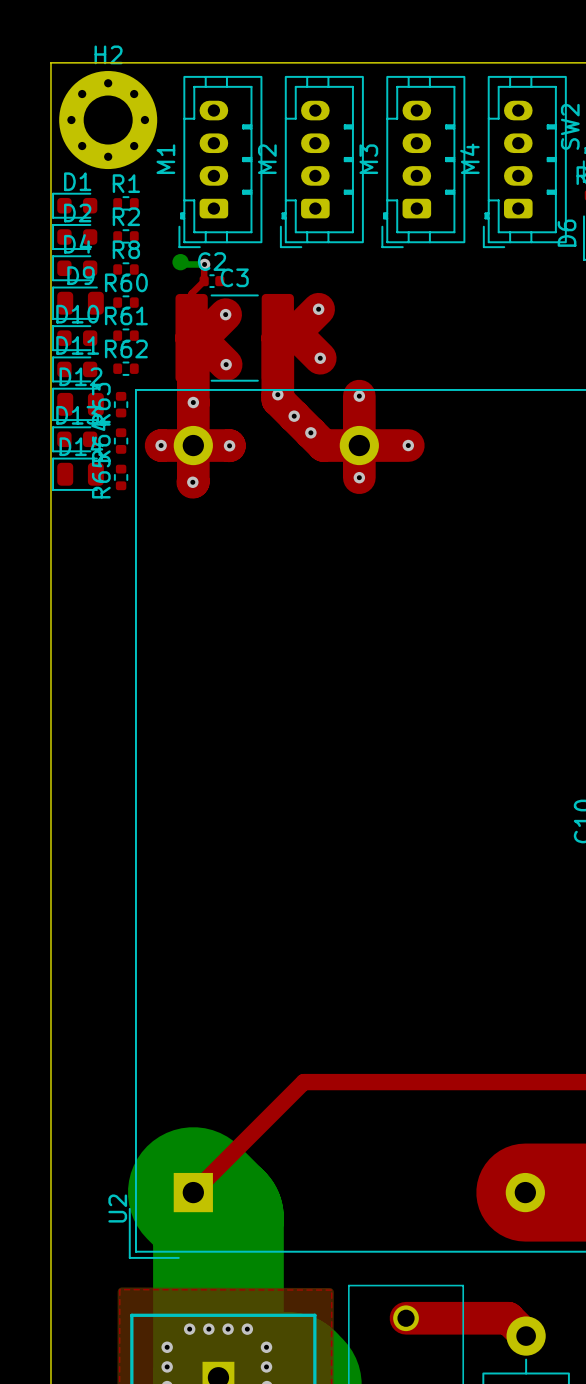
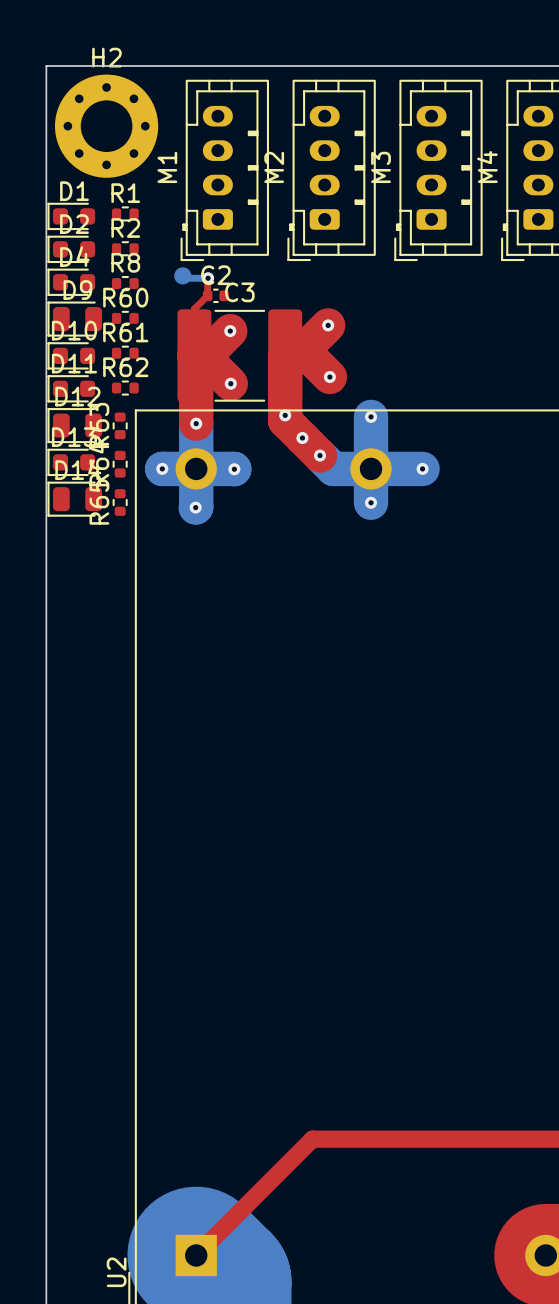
top track: (359, 396) (359, 477) -> none
bottom track: none -> (371, 416) (371, 502)
top track: (193, 402) (192, 482) -> none
bottom track: none -> (196, 423) (195, 507)
top track: (310, 432) (323, 445) (408, 445) -> none
bottom track: none -> (319, 455) (333, 468) (422, 468)
bottom track: none -> (162, 468) (234, 469)

